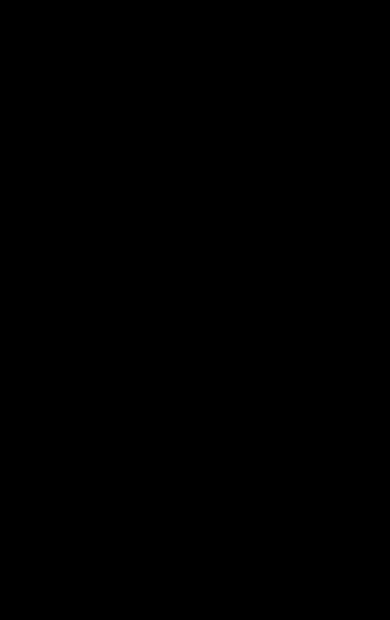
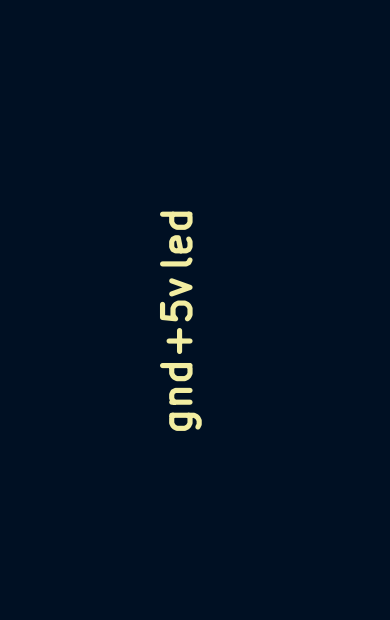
text: none -> led (176, 239)
text: none -> +5v (176, 316)
text: none -> gnd (180, 396)

